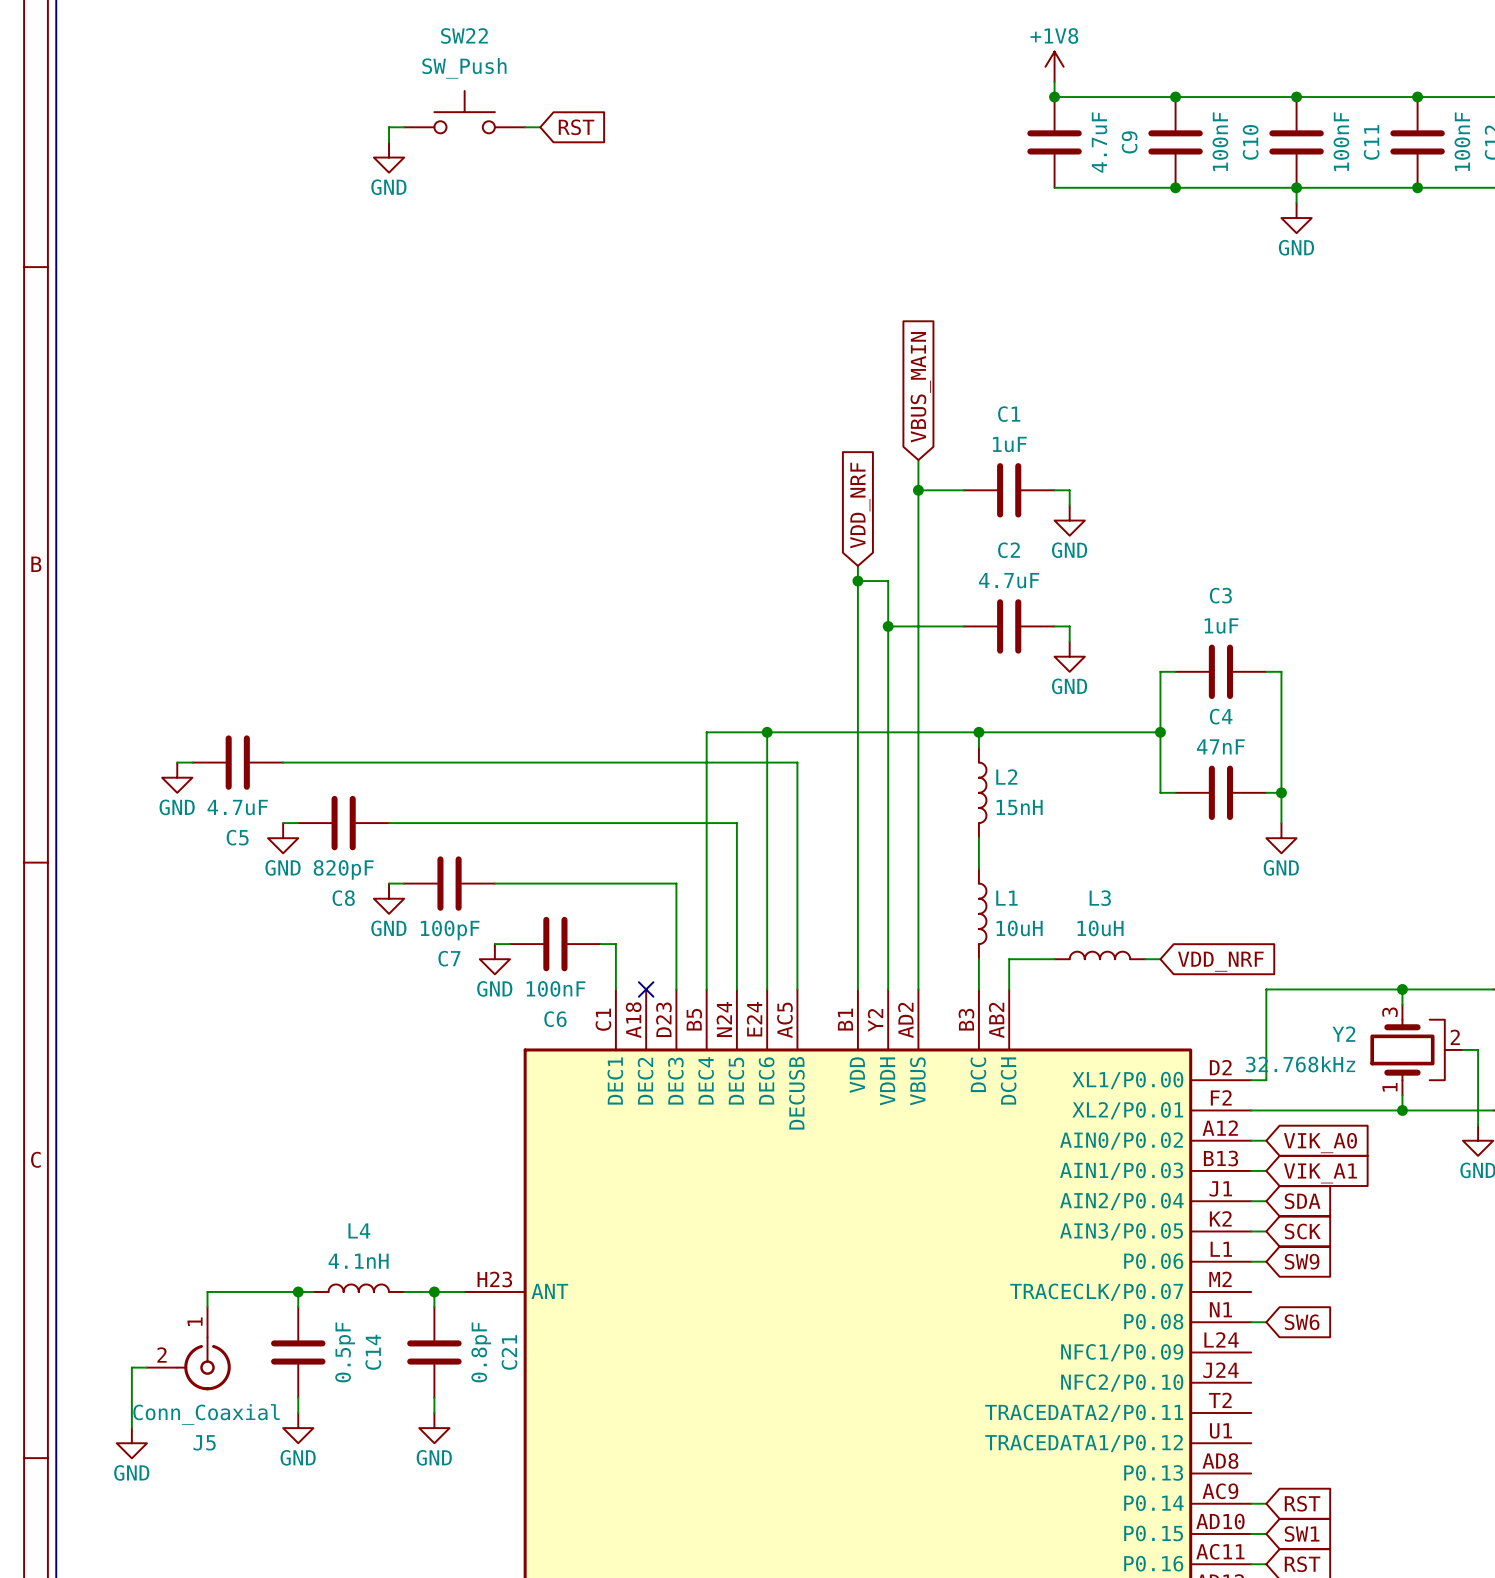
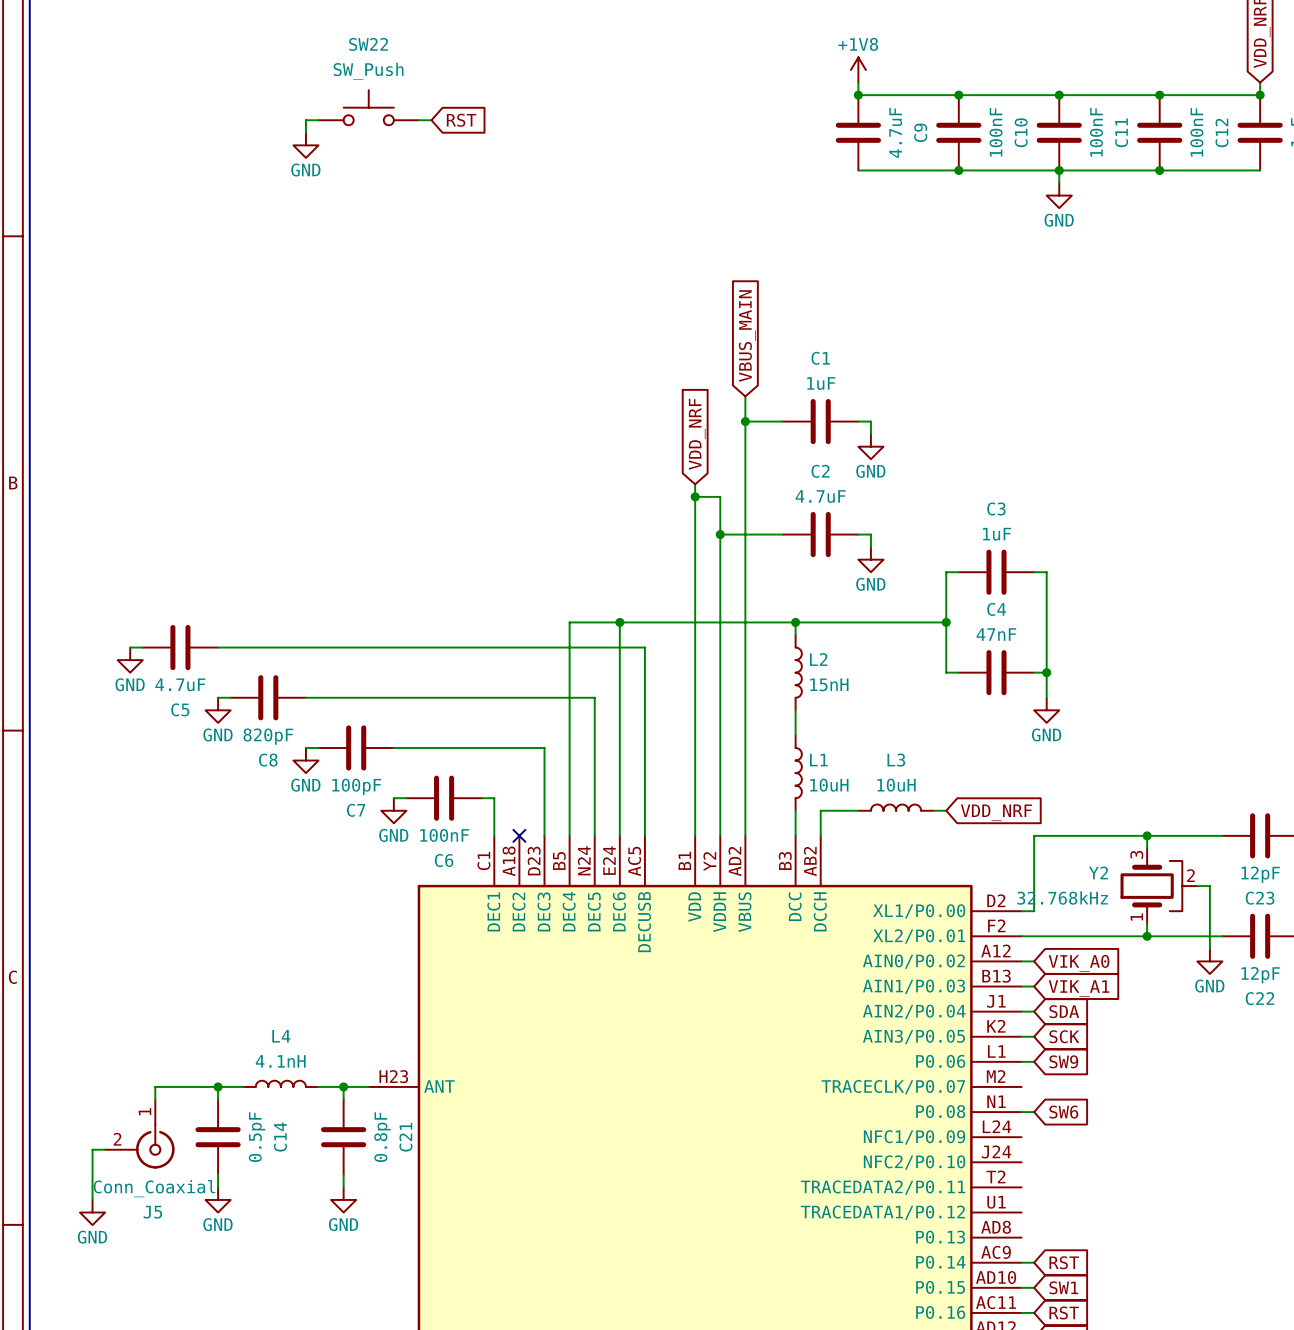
wire: (298, 1291) (298, 1307) -> (218, 1086) (218, 1099)
junction position: (298, 1291) -> (218, 1086)
C14 position: (298, 1352) -> (218, 1137)
wire: (298, 1397) (298, 1412) -> (218, 1174) (218, 1187)
power symbol position: GND (298, 1428) -> GND (218, 1199)

